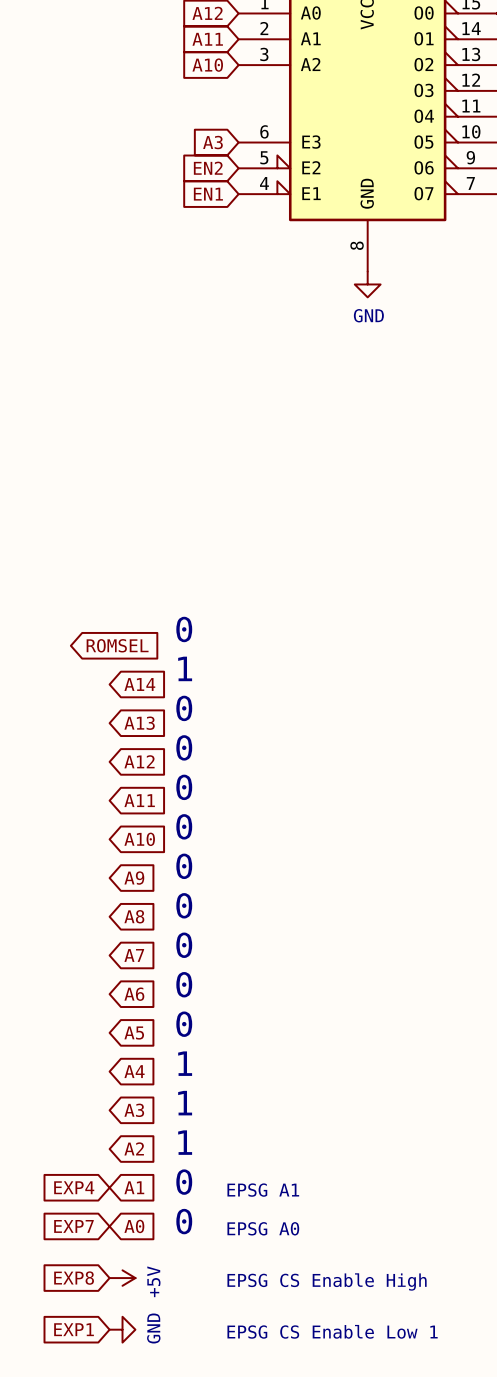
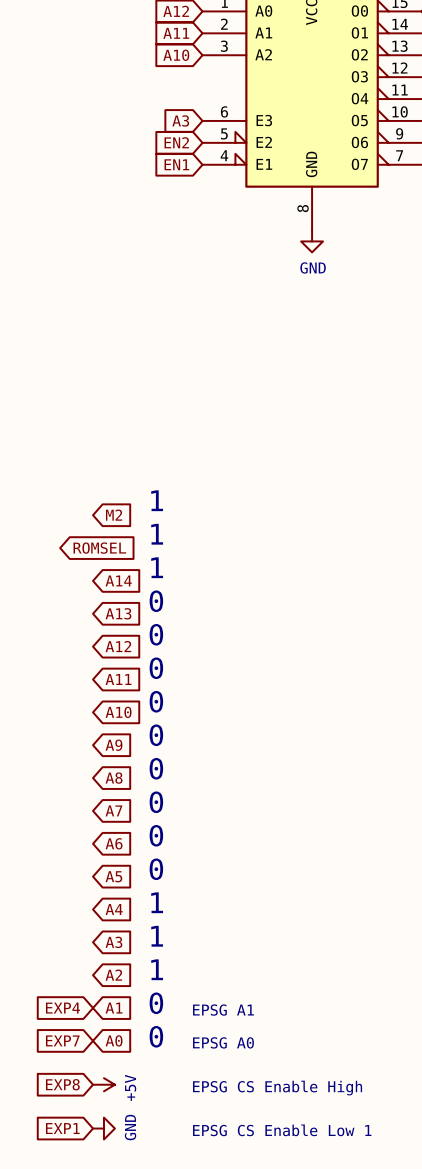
text: none -> 1 (157, 500)
global label: none -> M2 (114, 515)
text: 0 (184, 629) -> 1 (157, 534)

